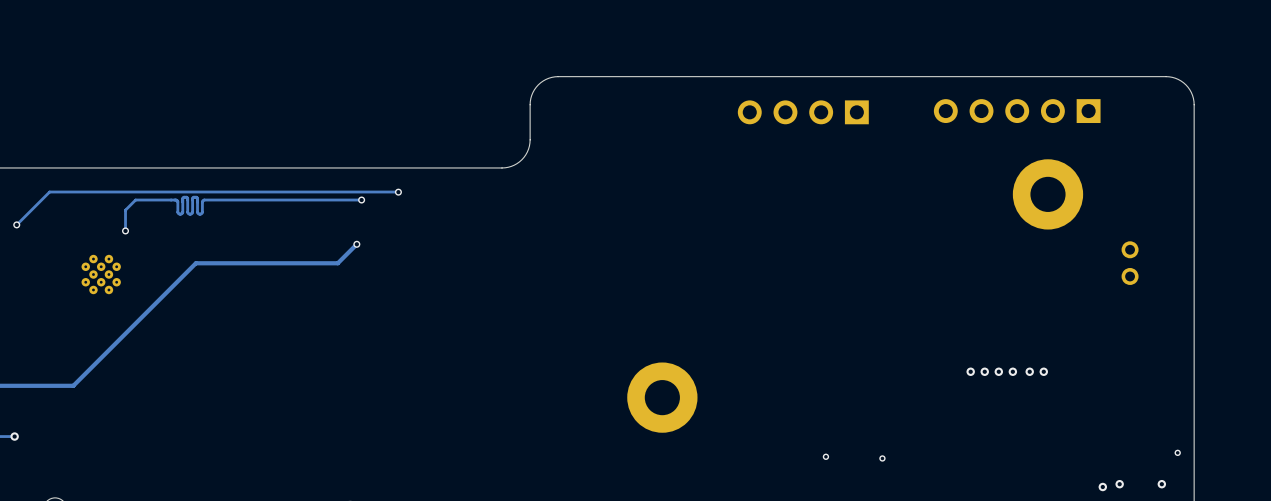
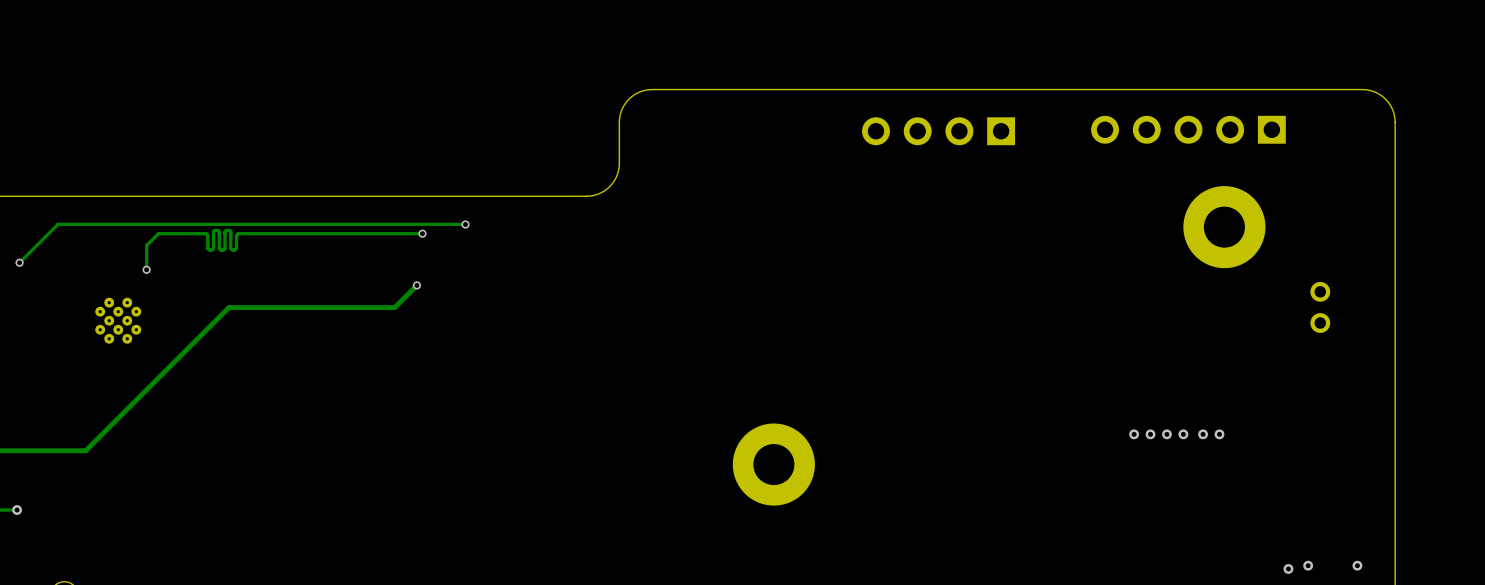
via: (1177, 452) -> none
via: (825, 456) -> none
via: (882, 458) -> none

